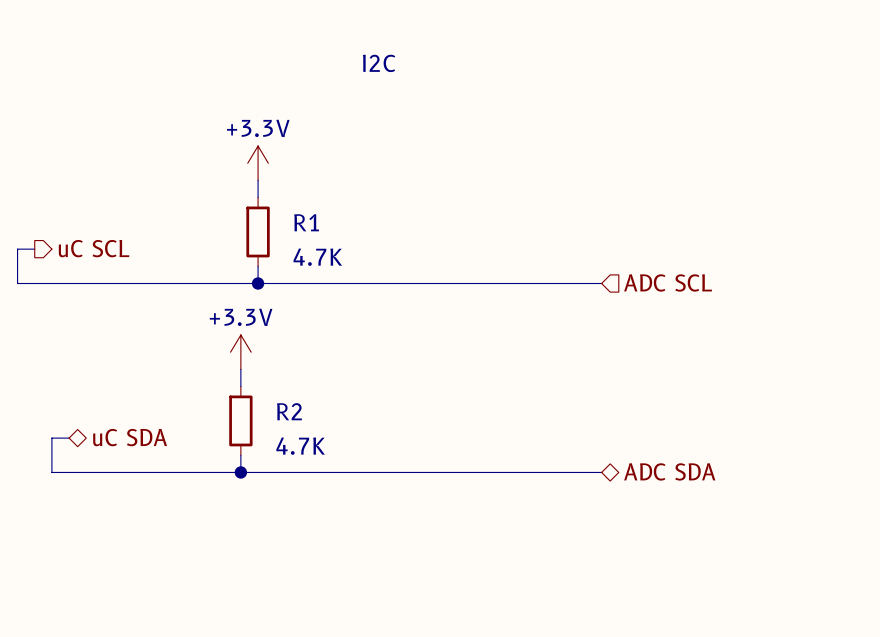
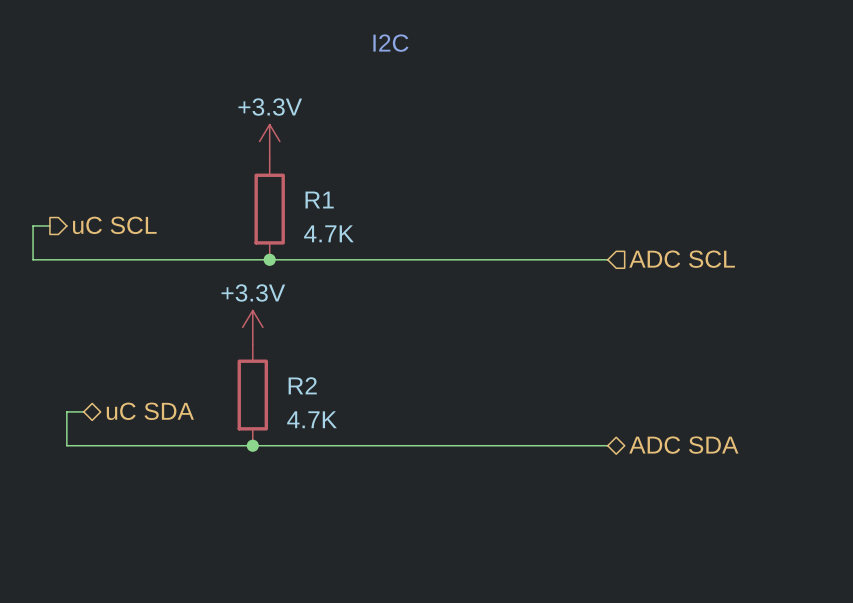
R1 symbol: [246, 197, 270, 267] -> [254, 158, 285, 260]
R2 symbol: [229, 386, 253, 456] -> [237, 344, 269, 446]

